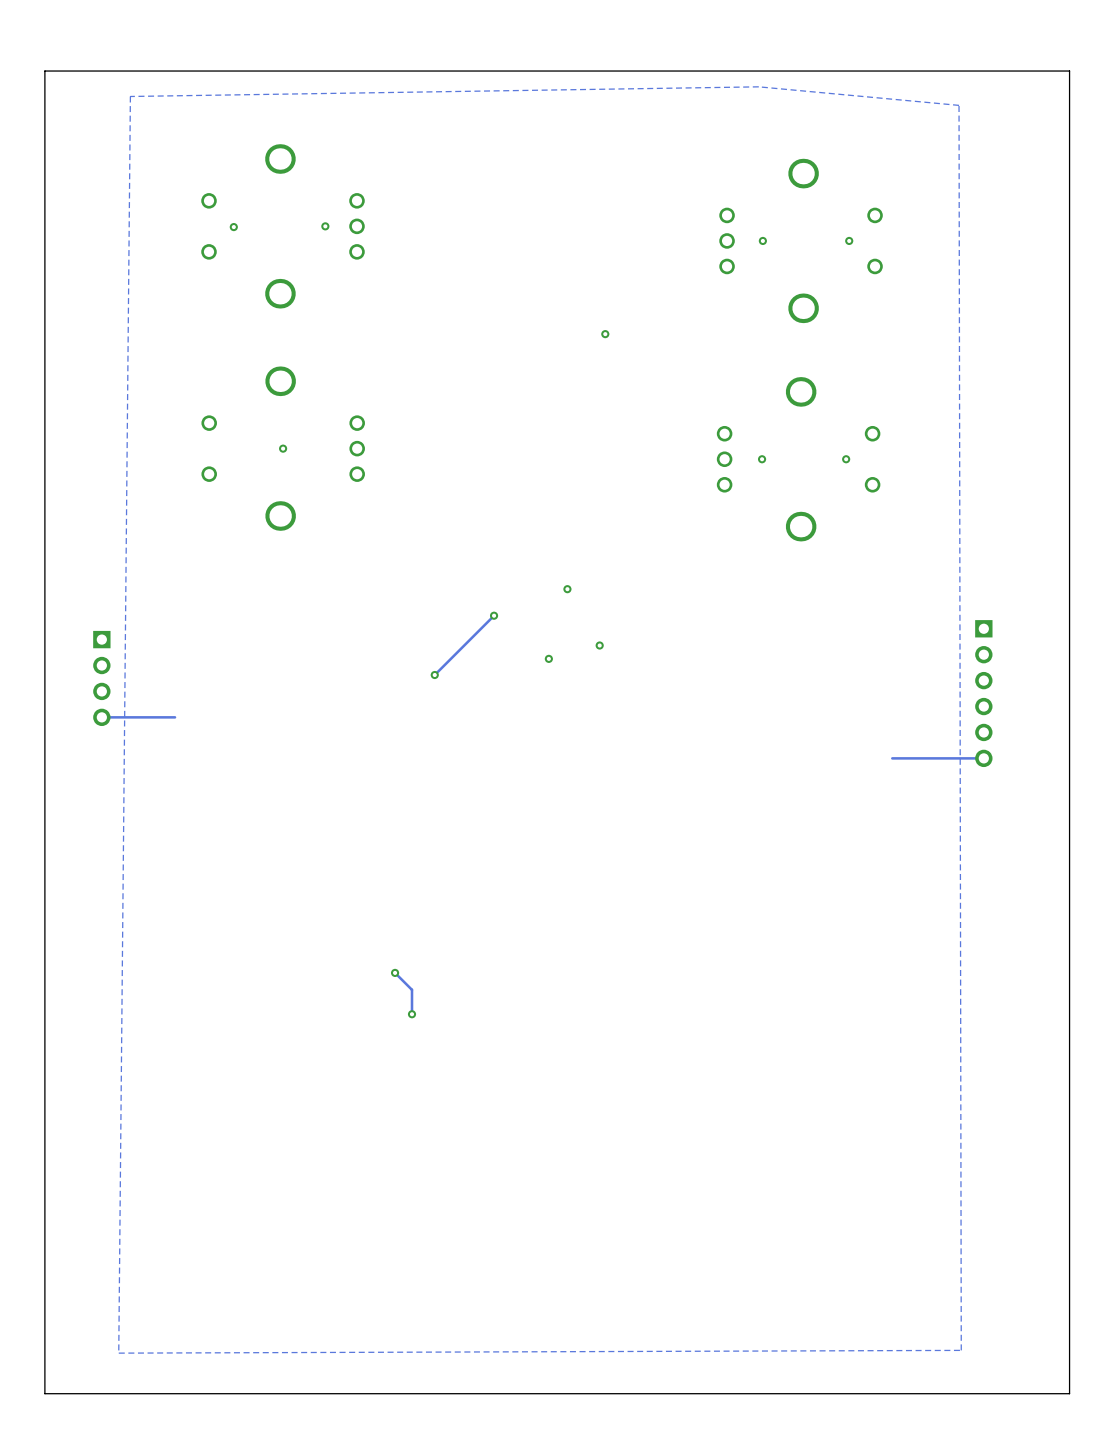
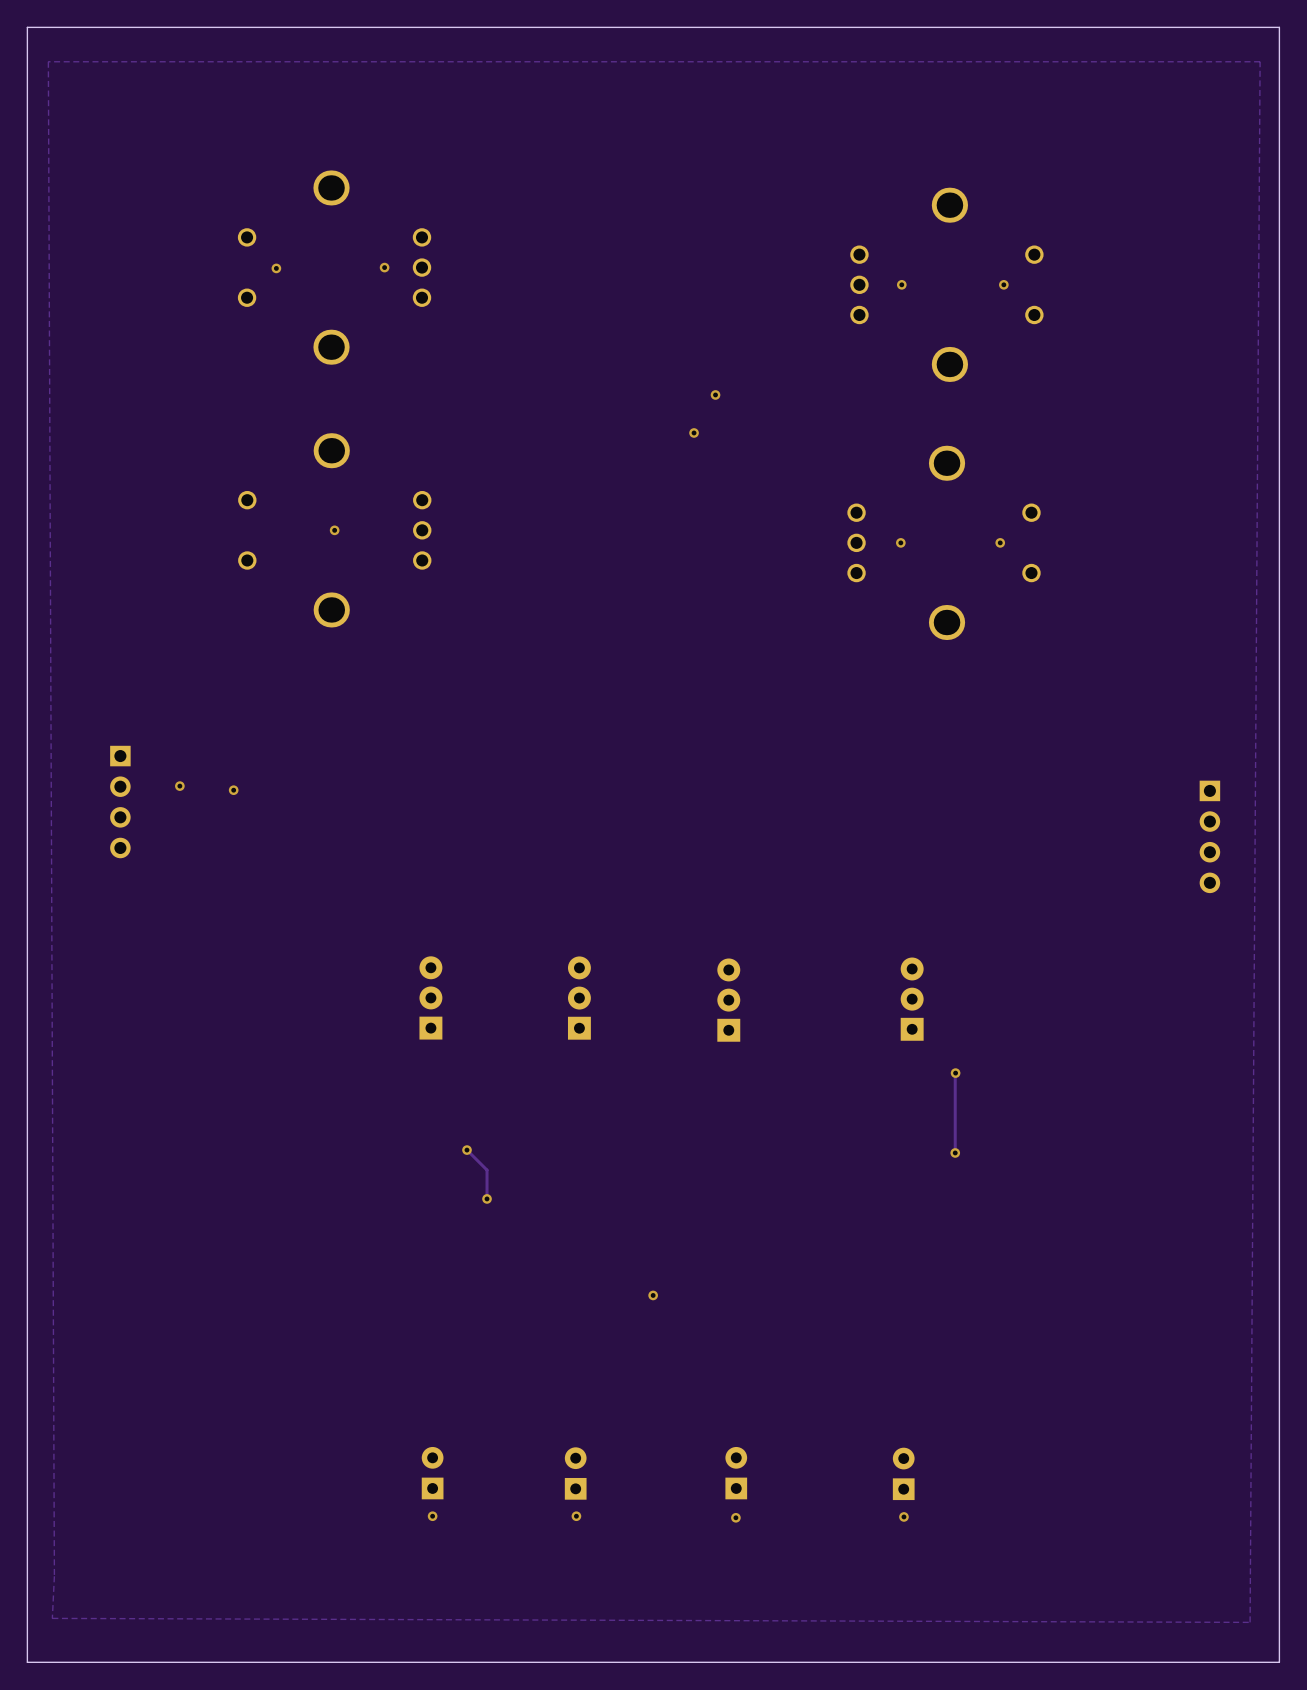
board edge: (1069, 71) (1069, 1393) (44, 1393) (44, 71) (1069, 71) -> (1279, 27) (1279, 1662) (27, 1662) (27, 27) (1279, 27)
zone outline: (758, 86) (959, 105) (961, 1350) (118, 1353) (130, 96) (758, 86) -> (1260, 61) (1250, 1622) (52, 1618) (54, 1576) (48, 61) (1260, 61)
via: none -> (694, 432)
via: (567, 589) -> none
track: (494, 615) (434, 675) -> none
via: (494, 615) -> none
via: (599, 645) -> none
via: (548, 658) -> none
via: none -> (179, 786)
via: none -> (233, 790)
via: (434, 675) -> none
part: (983, 693) -> none
part: none -> (1209, 836)
track: (175, 717) (101, 717) -> none
track: (983, 758) (892, 758) -> none
part: none -> (430, 997)
part: none -> (579, 998)
part: none -> (912, 999)
part: none -> (728, 1000)
track: none -> (955, 1073) (955, 1152)
via: none -> (955, 1073)
via: none -> (955, 1152)
via: none -> (653, 1295)
part: none -> (432, 1473)
part: none -> (575, 1473)
part: none -> (736, 1473)
part: none -> (903, 1473)
via: none -> (432, 1516)
via: none -> (576, 1516)
via: none -> (735, 1517)
via: none -> (903, 1516)

